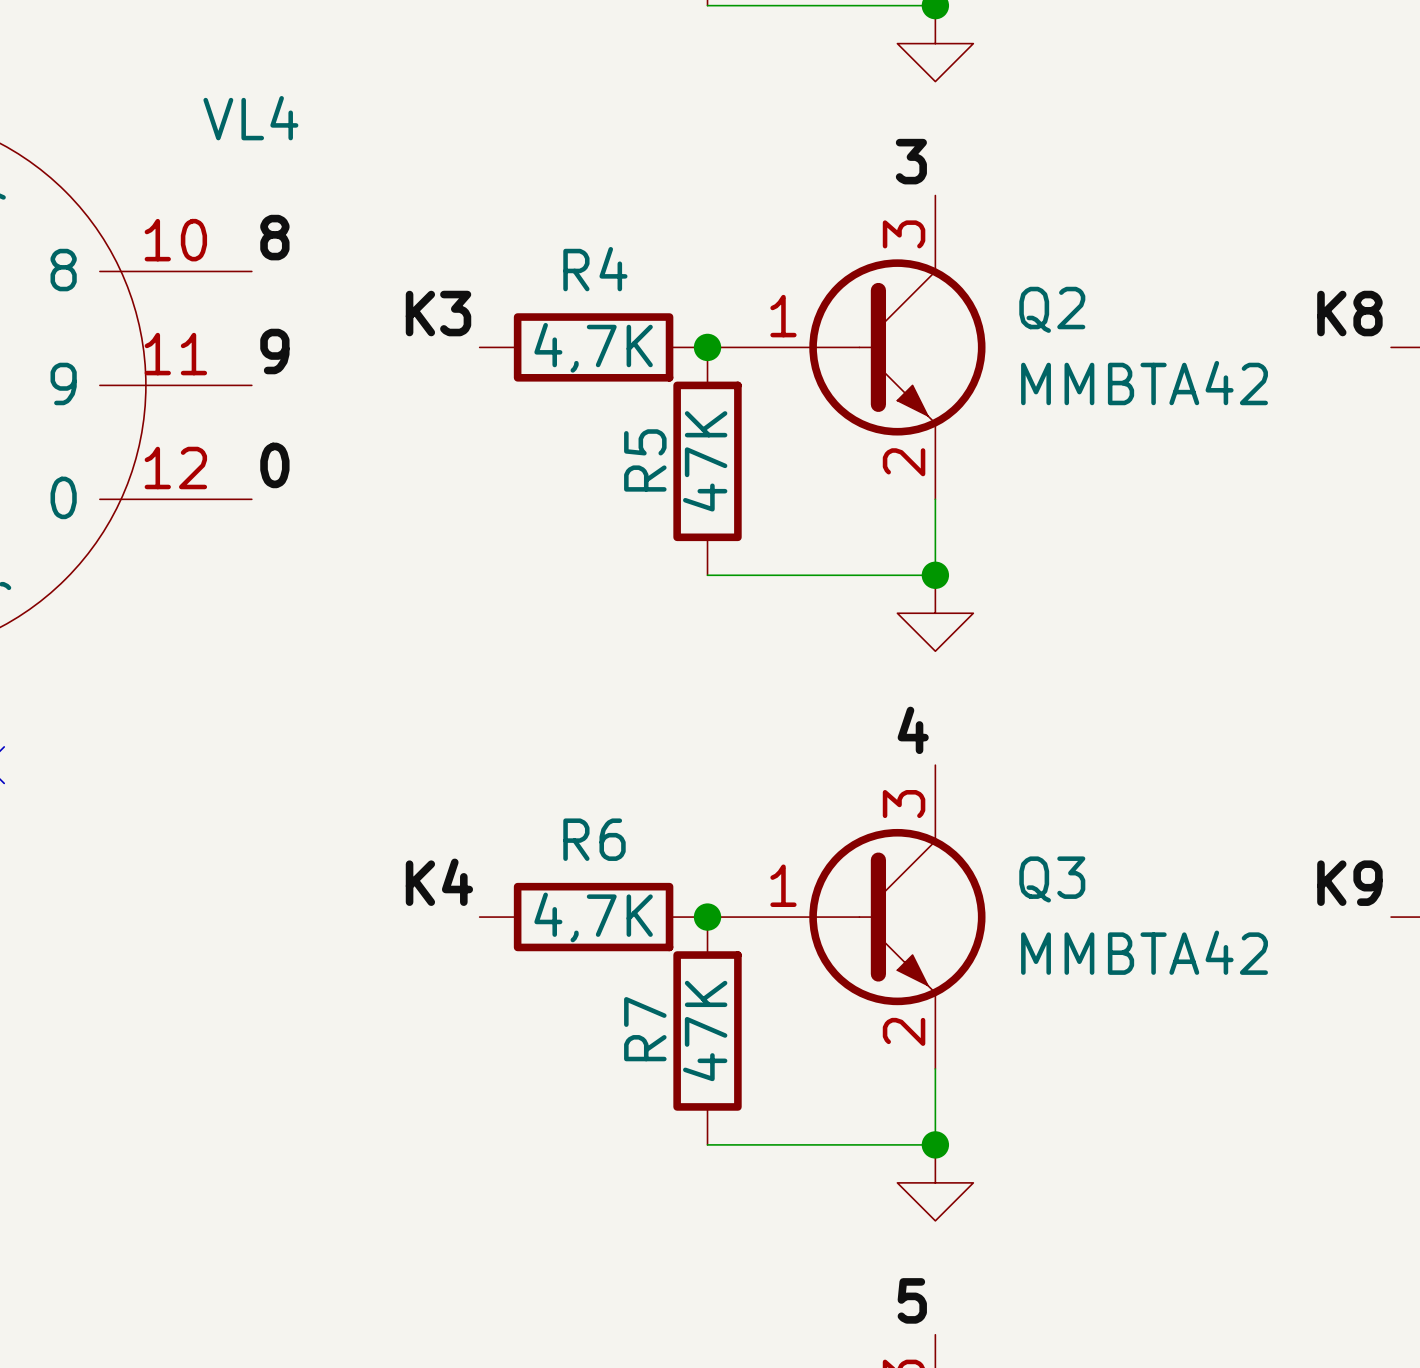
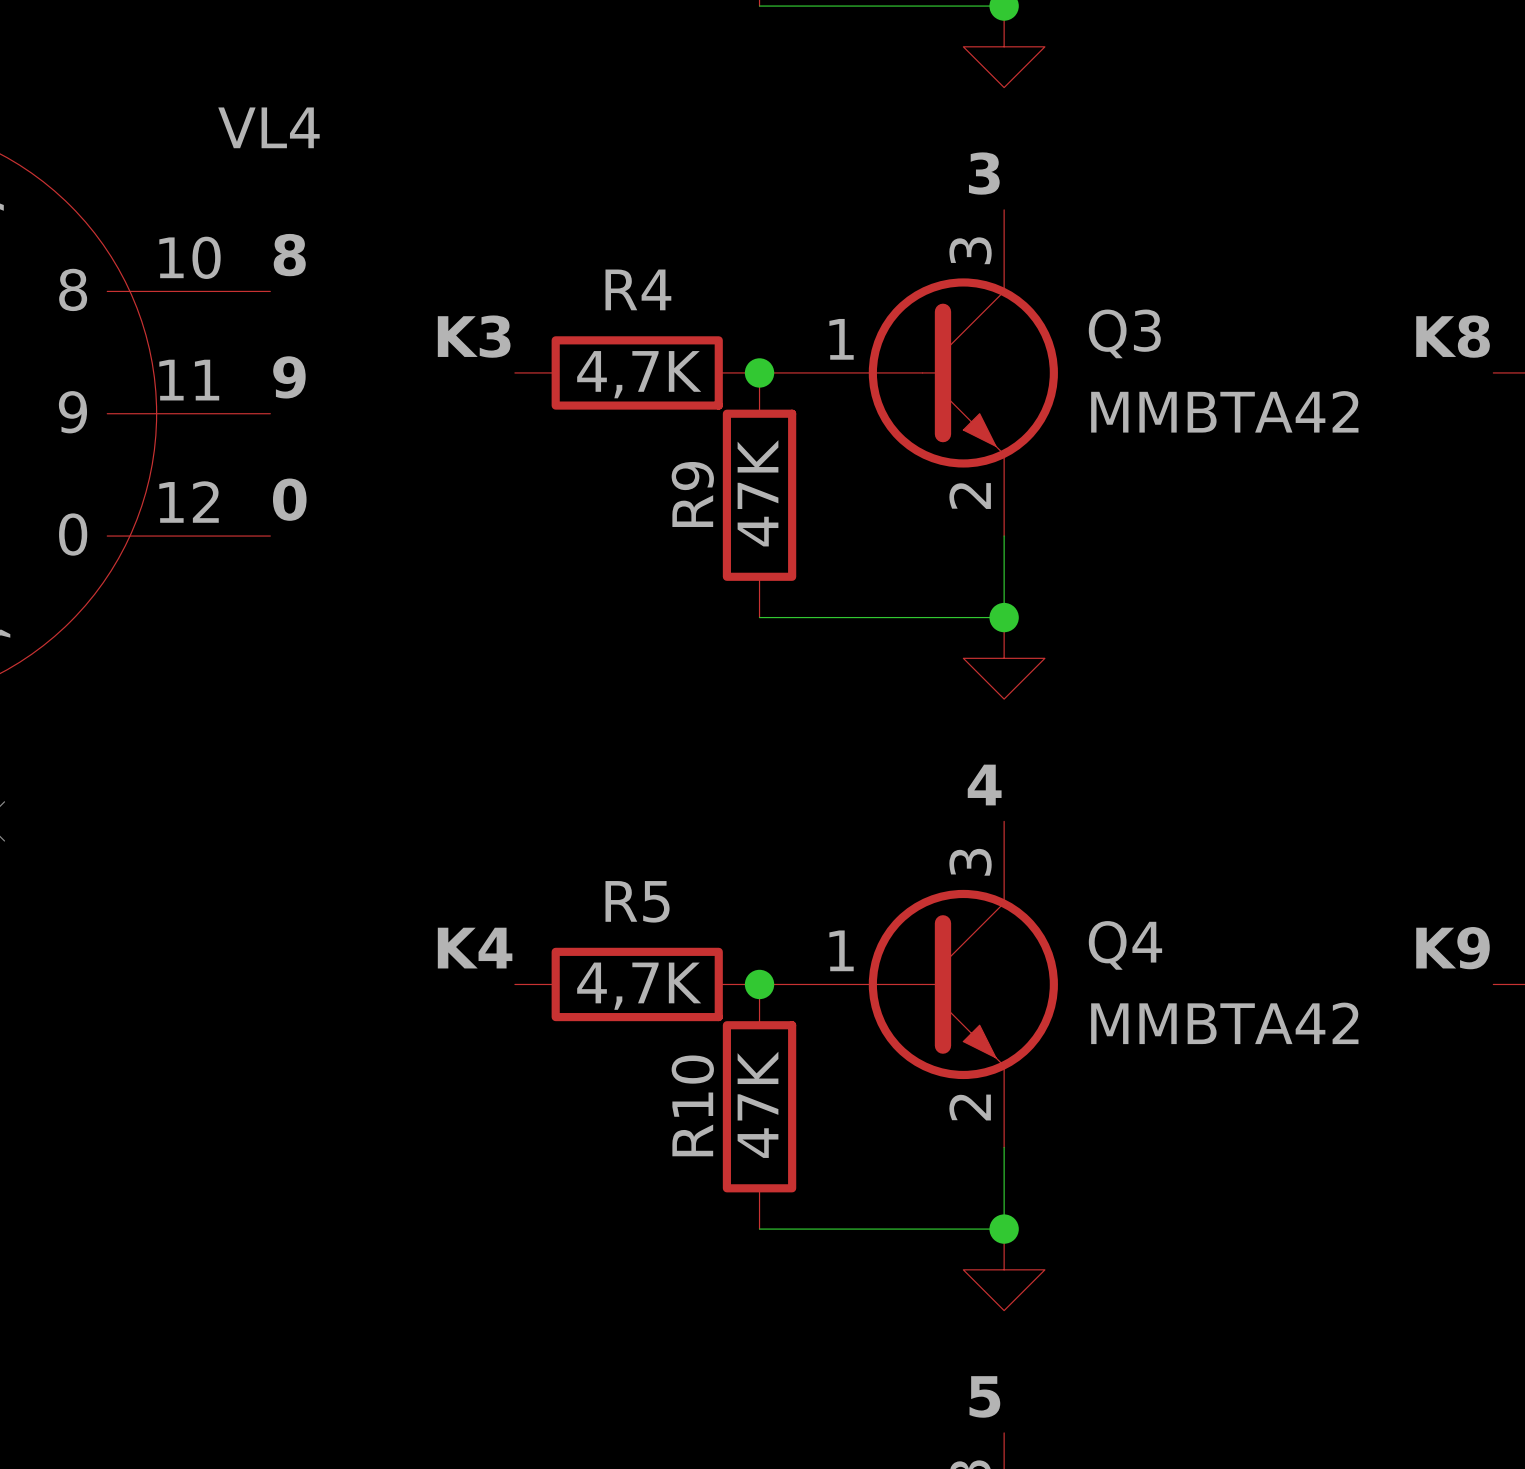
Q2 name: Q2 (1052, 309) -> Q3 (1124, 333)
R5 name: R5 (645, 460) -> R9 (692, 494)
R6 name: R6 (594, 839) -> R5 (637, 901)
Q3 name: Q3 (1052, 879) -> Q4 (1125, 945)
R7 name: R7 (645, 1029) -> R10 (692, 1105)

